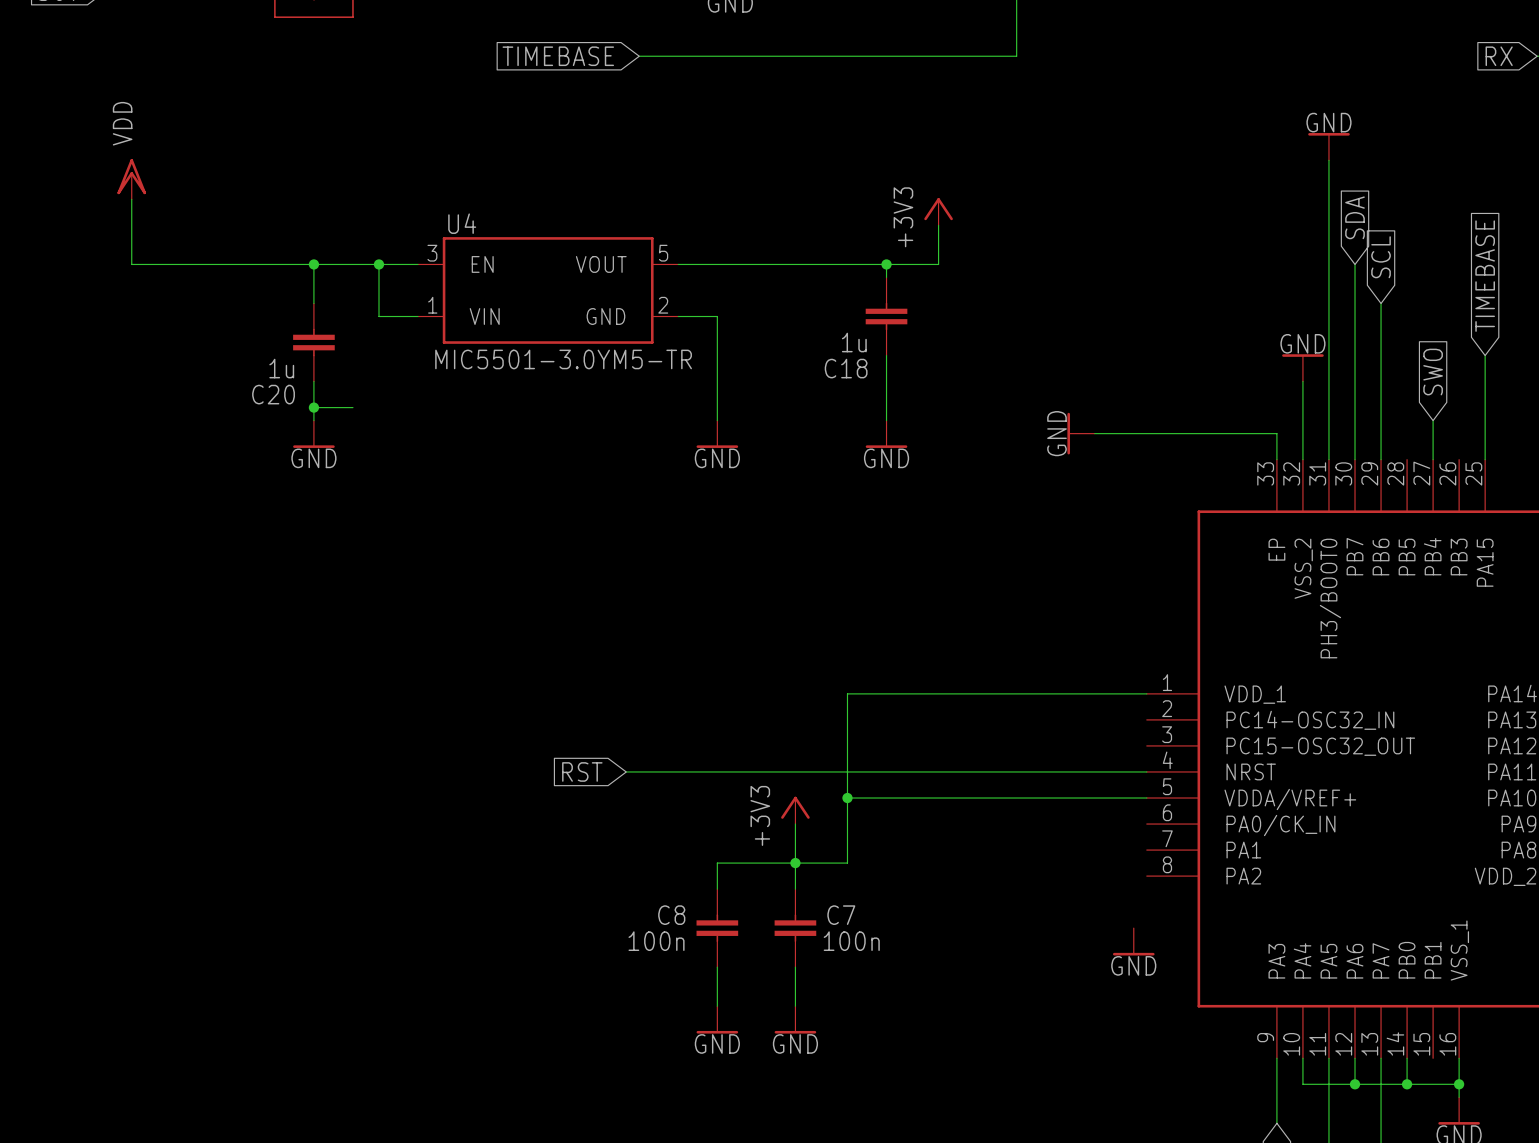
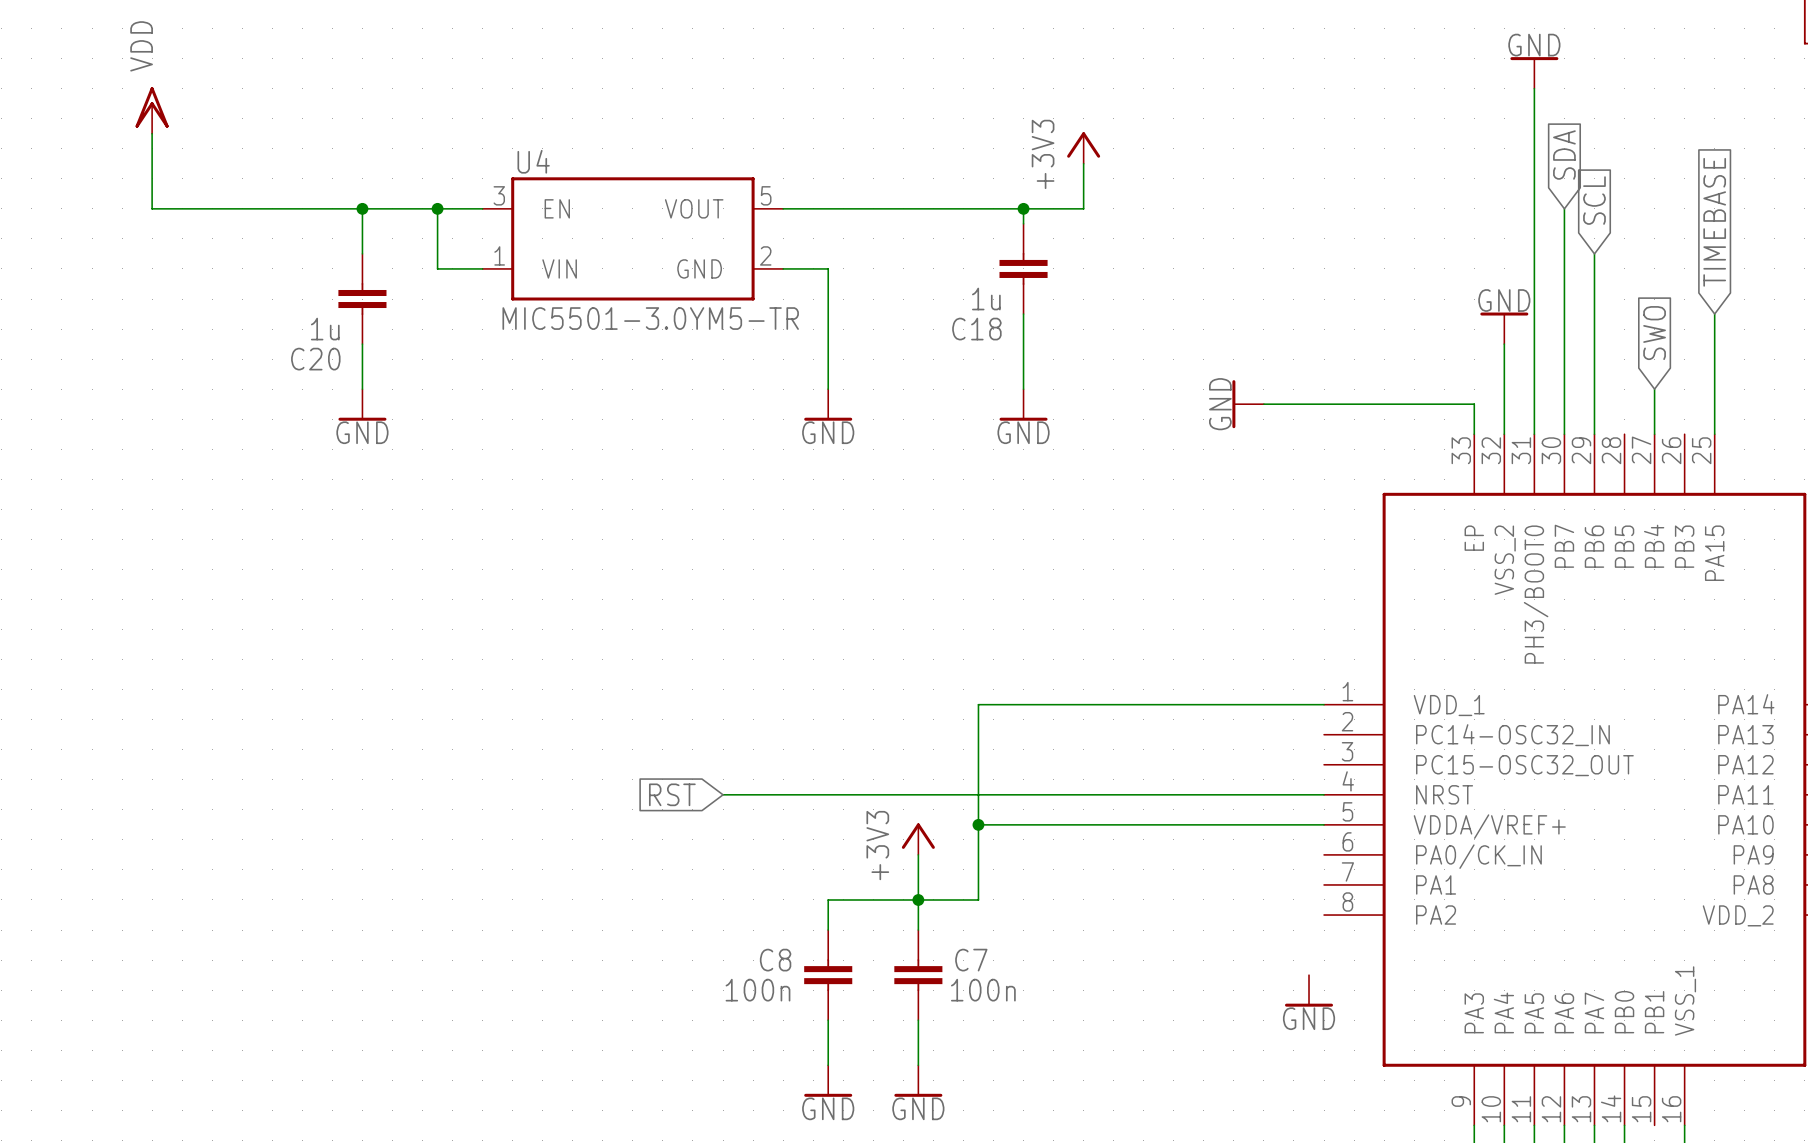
wire: (313, 407) (352, 407) -> none
junction: (313, 407) -> none

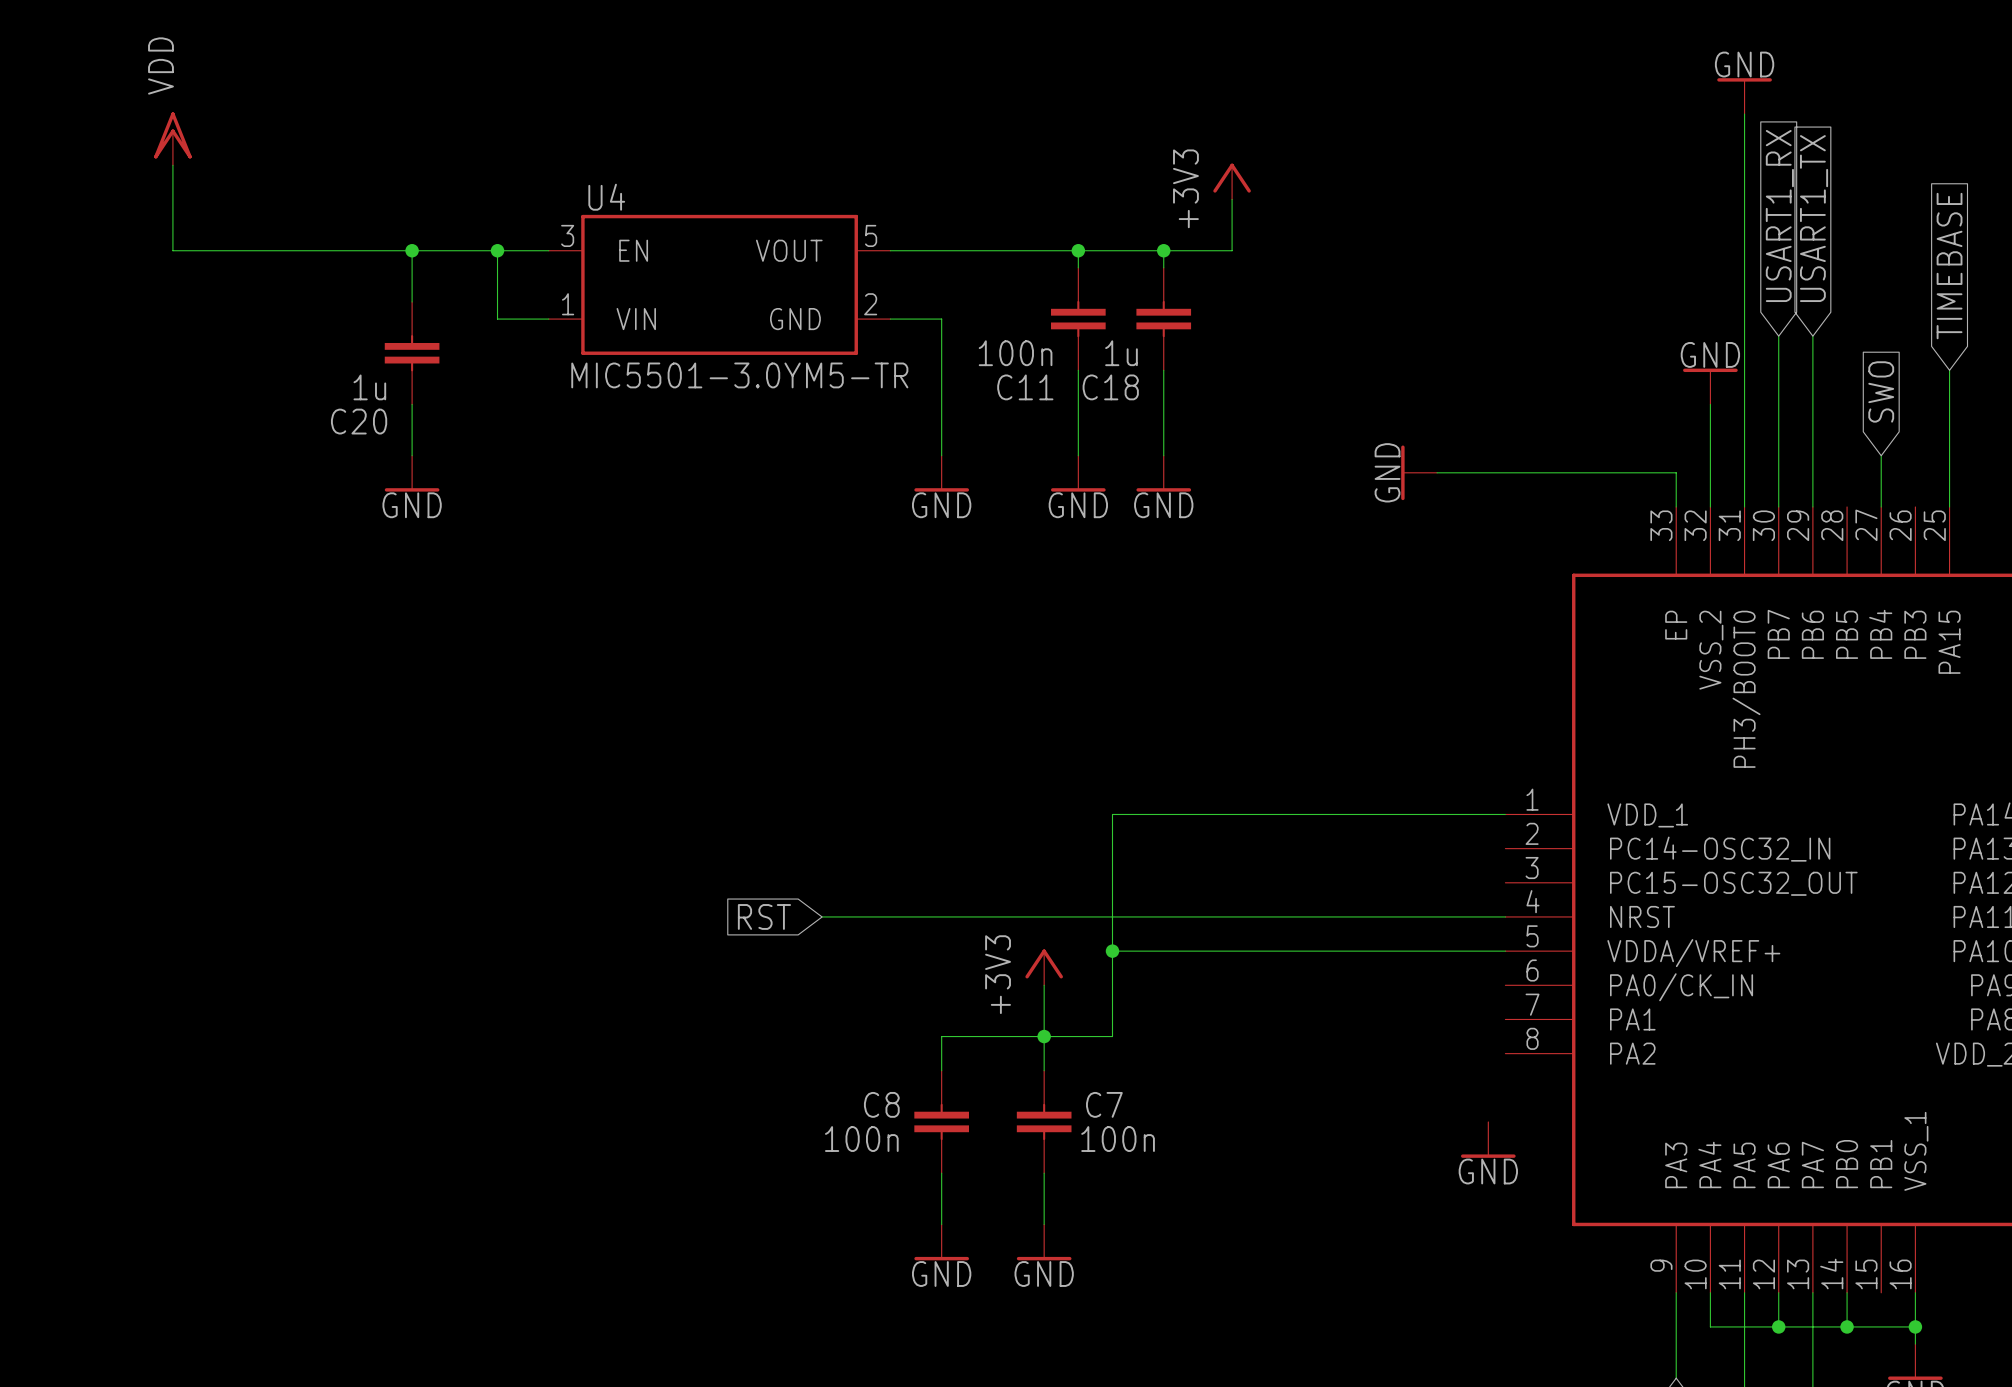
global label: SDA (1564, 155) -> none
global label: none -> USART1_RX (1779, 215)
global label: none -> USART1_TX (1814, 218)
global label: SCL (1594, 200) -> none
wire: none -> (1078, 250) (1078, 267)
junction: none -> (1078, 250)
wire: (1564, 208) (1564, 283) -> none
wire: (1594, 253) (1594, 283) -> none
C11: none -> 100n (1078, 319)
wire: none -> (1078, 370) (1078, 455)
power symbol: none -> GND (1078, 473)

